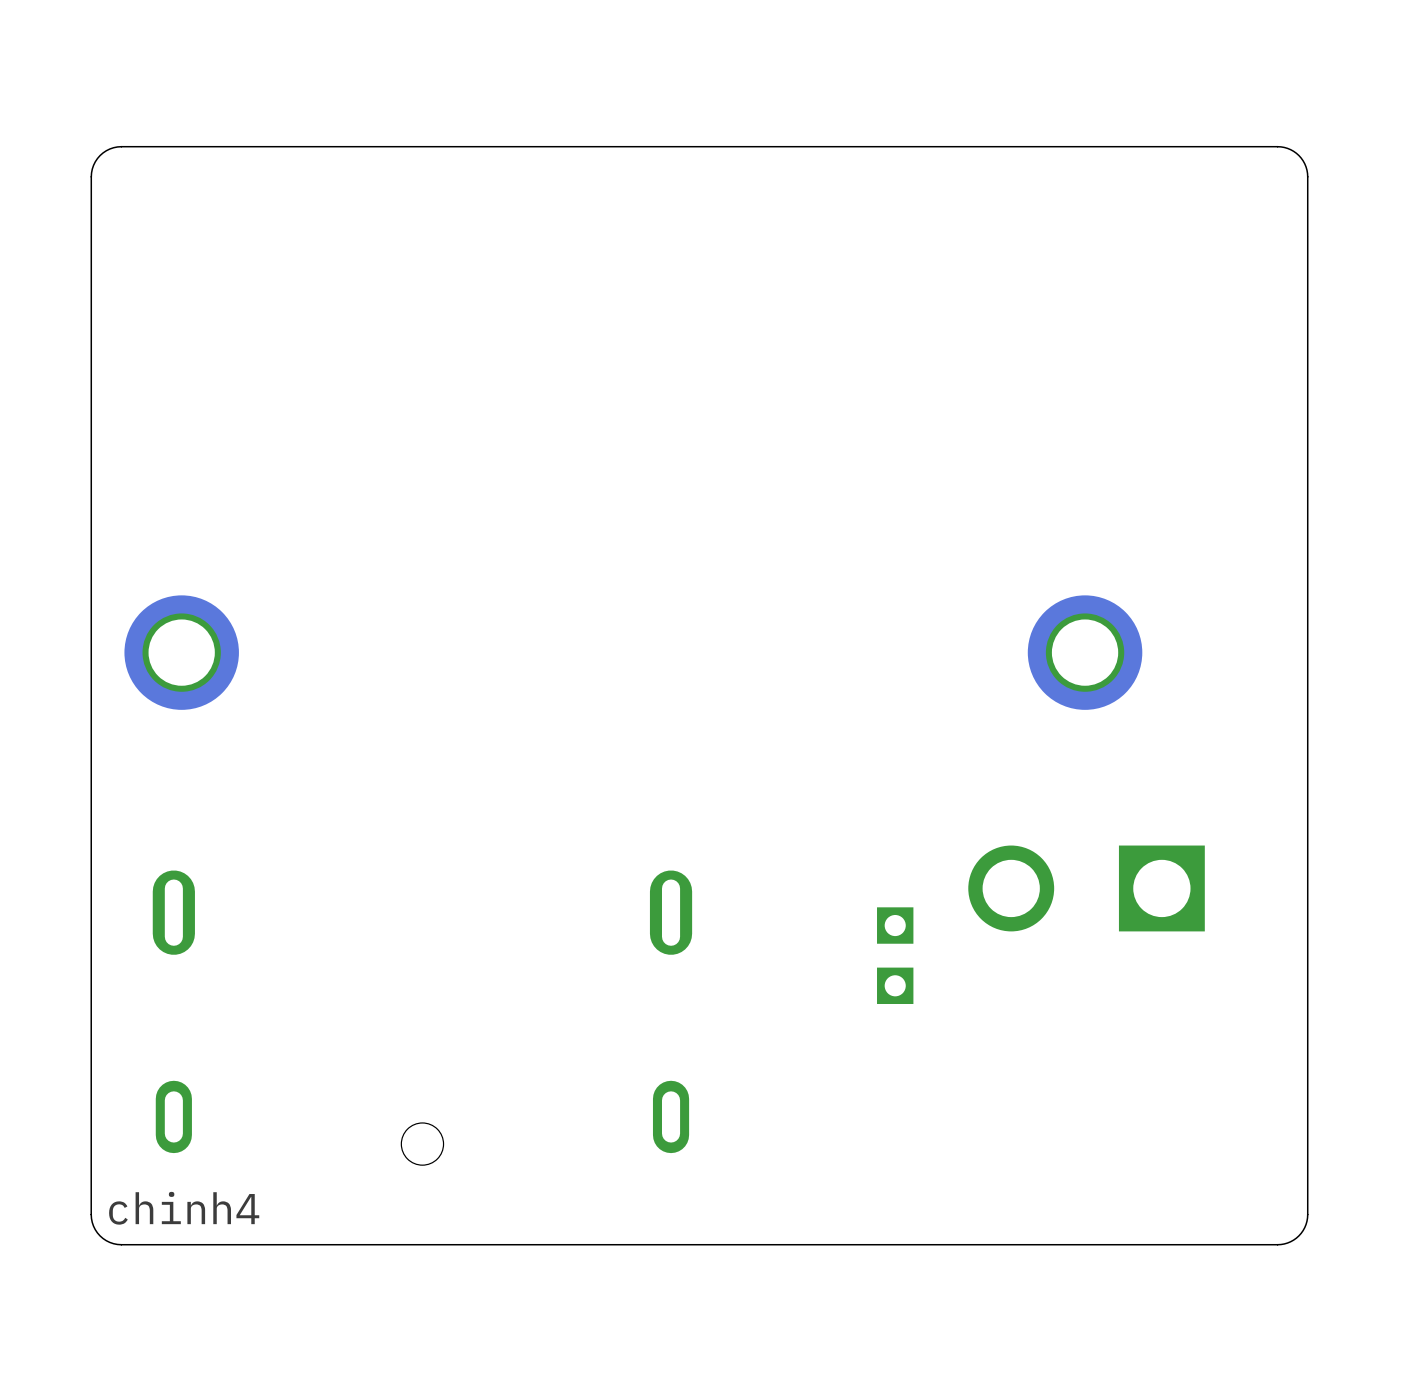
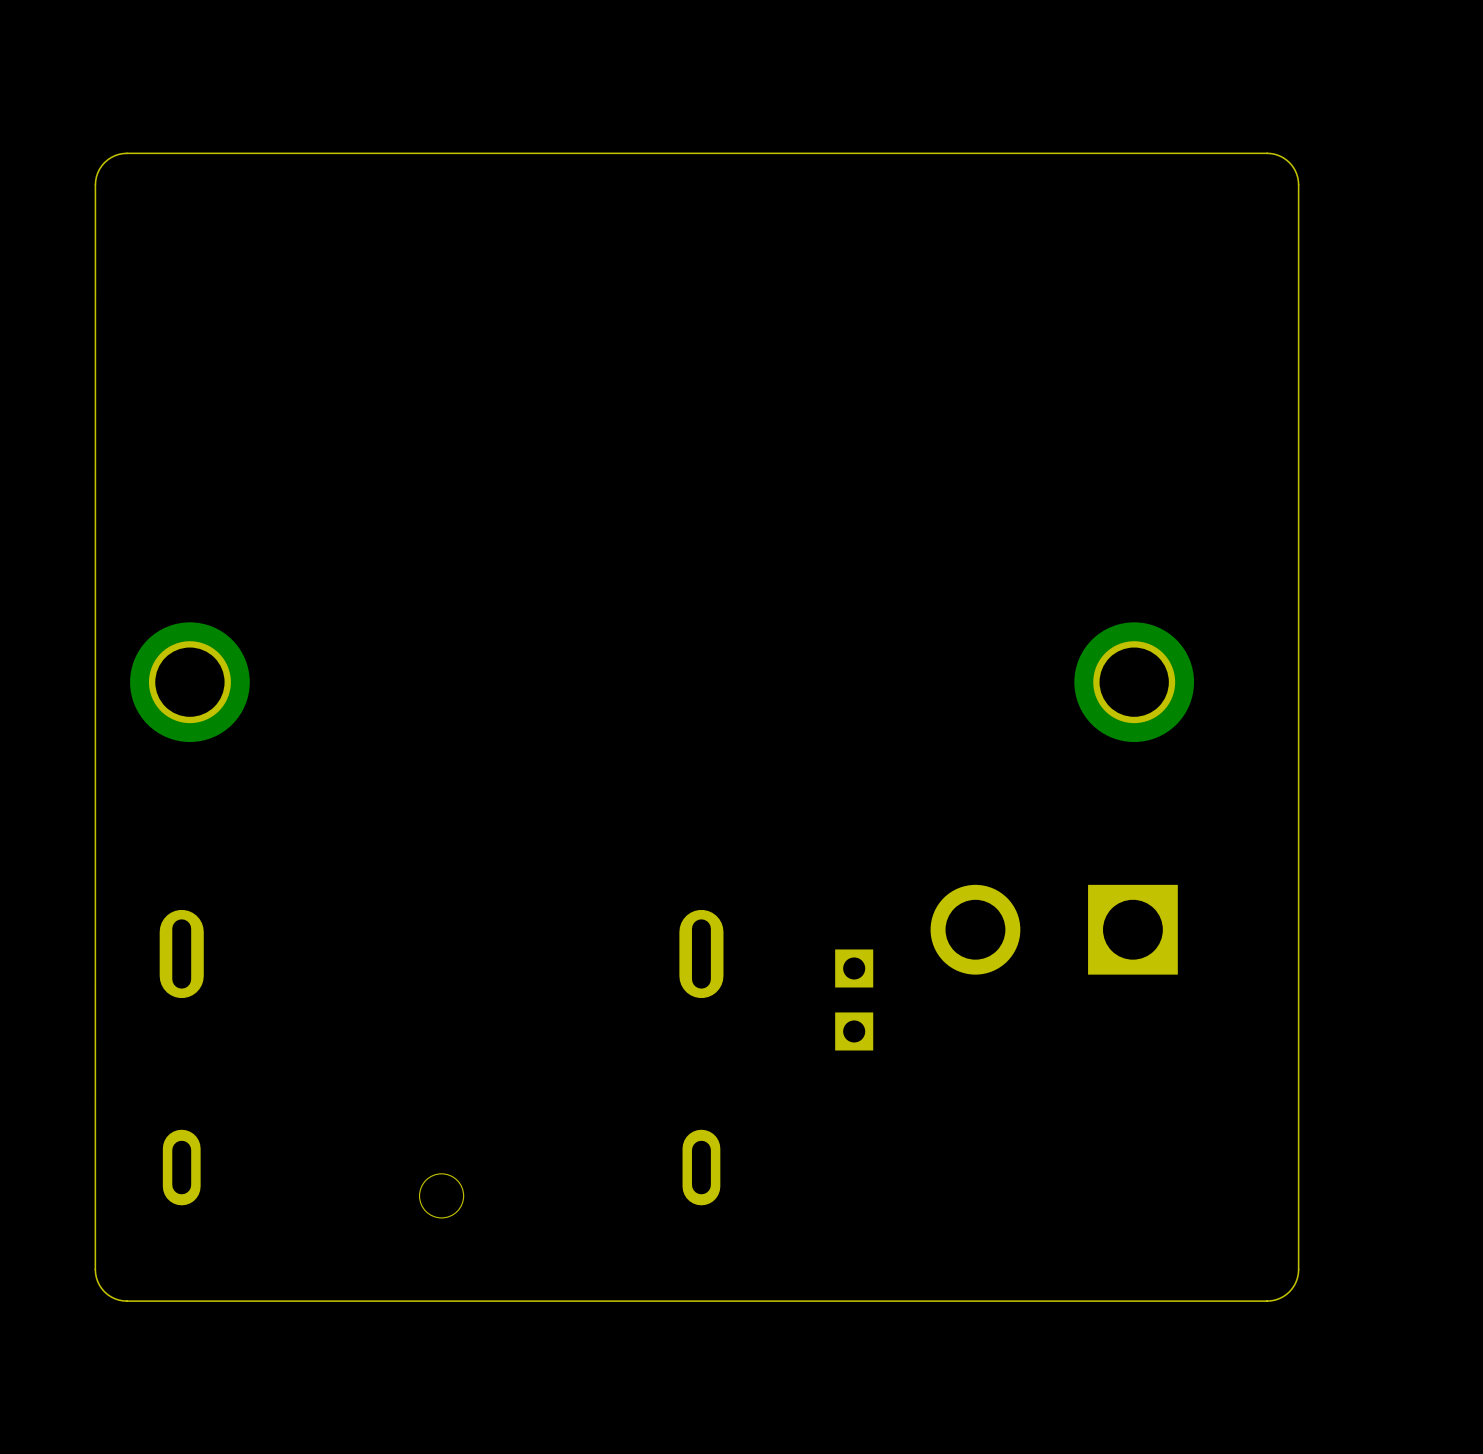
board edge: (1212, 146) (1287, 148) (1301, 158) (1306, 166) (1307, 176) (1307, 1217) (1304, 1227) (1298, 1235) (1284, 1243) (1212, 1244) -> (1267, 153) (1280, 156) (1289, 162) (1296, 174) (1298, 184) (1298, 1269) (1295, 1283) (1289, 1291) (1280, 1297) (1267, 1301)
part position: (1040, 924) -> (1006, 967)
text: chinh4 (184, 1208) -> none

